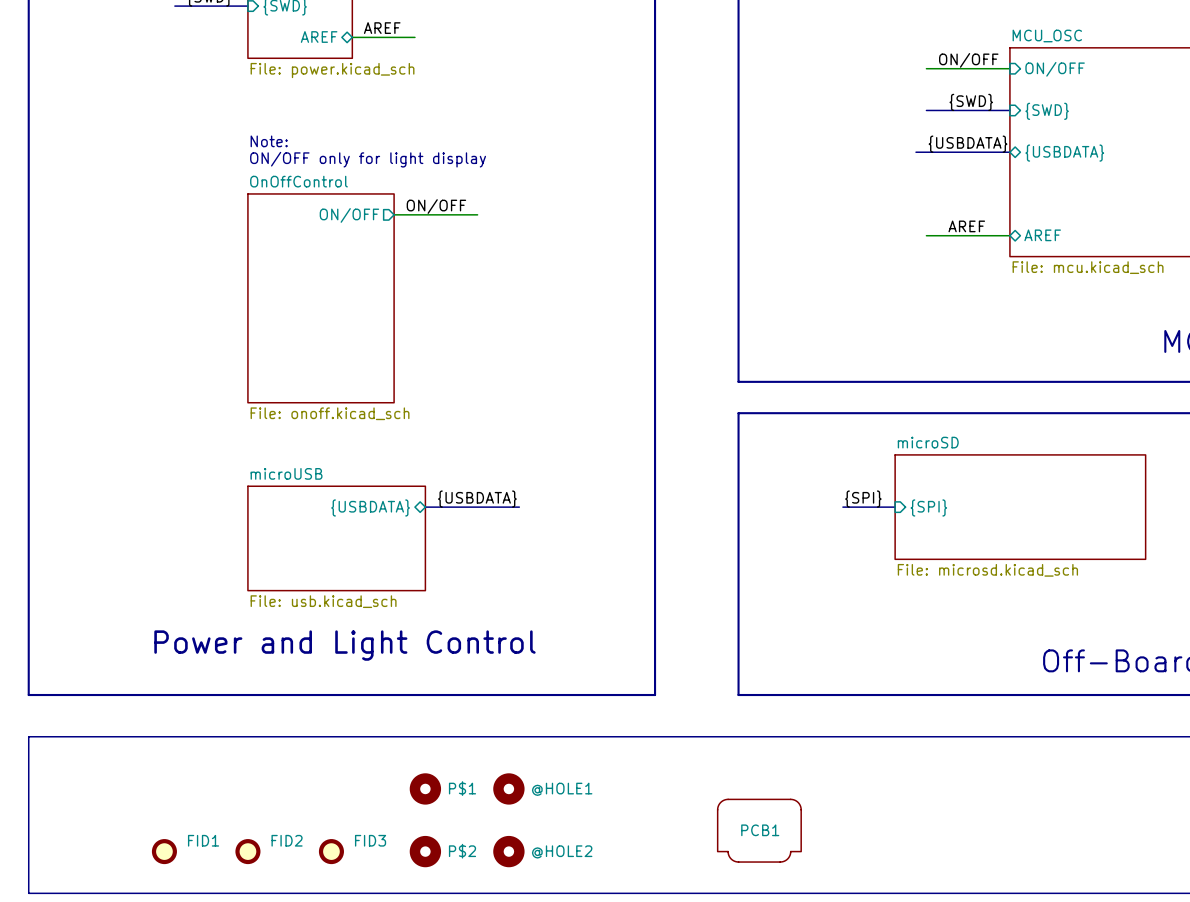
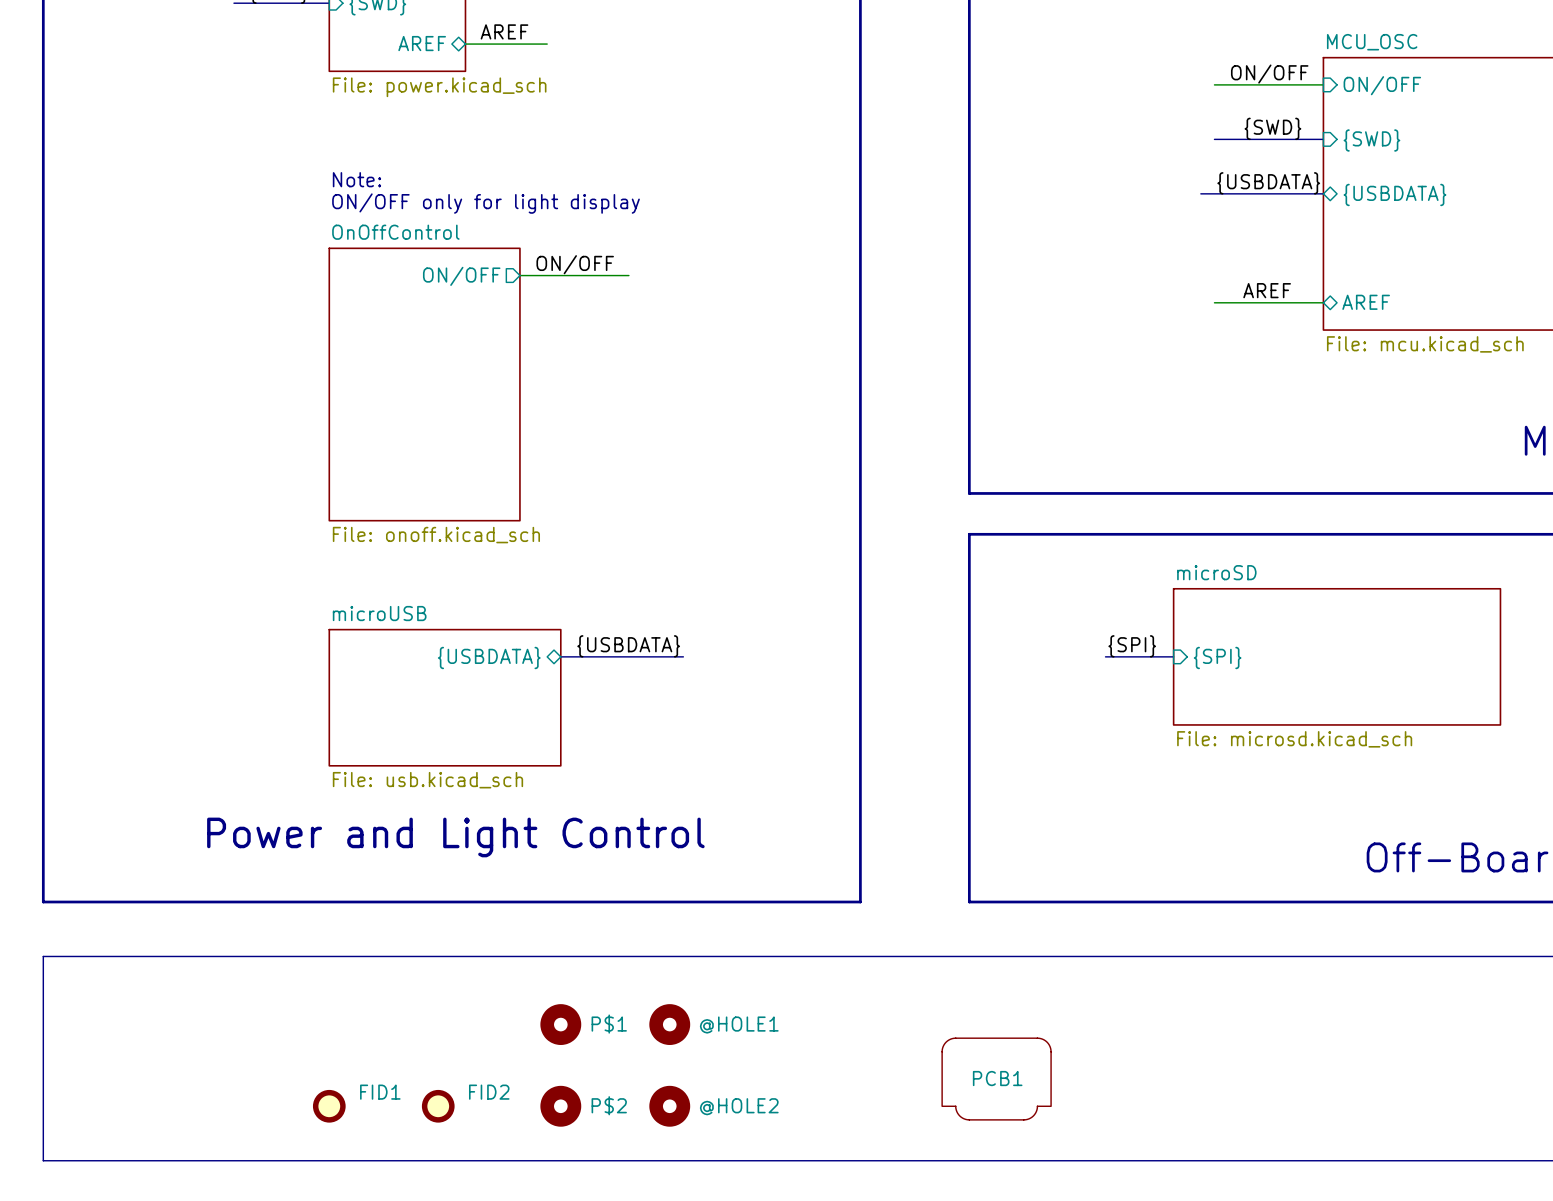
FID2 name: FID2 (287, 840) -> FID1 (380, 1092)
FID3 name: FID3 (370, 840) -> FID2 (489, 1092)
FID1: (164, 851) -> none

